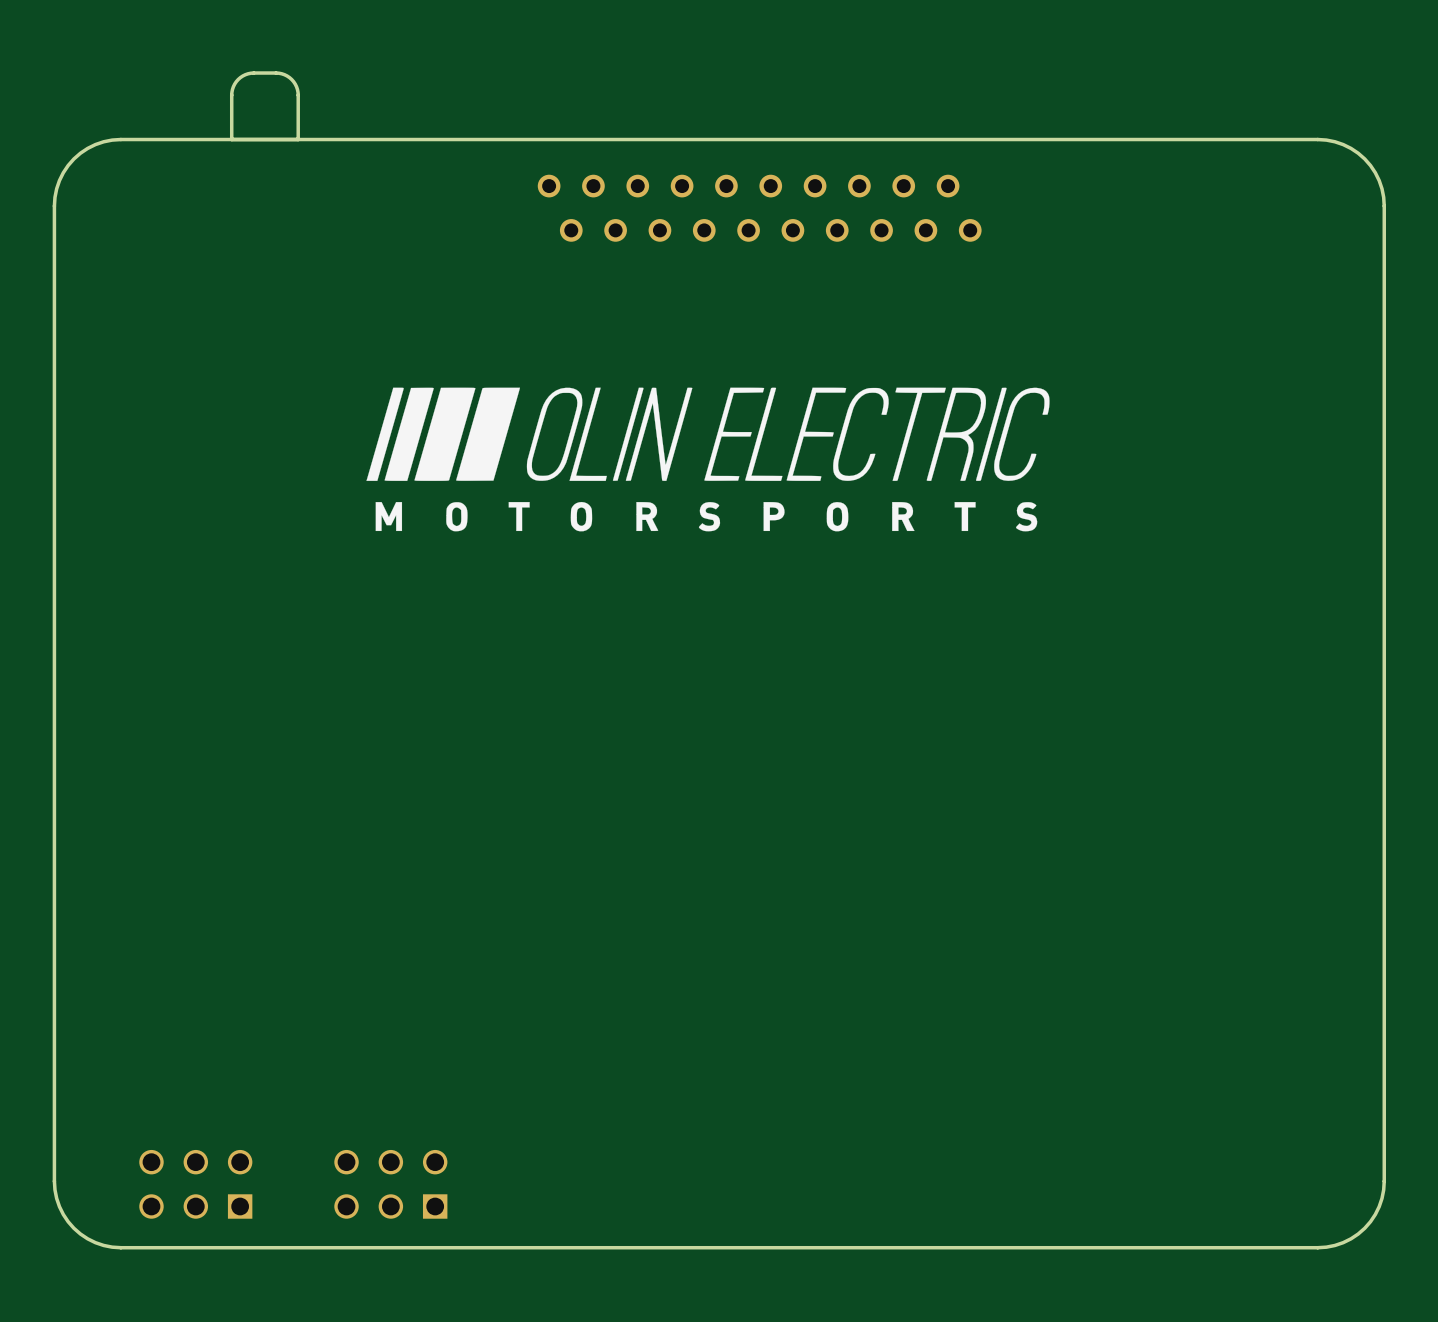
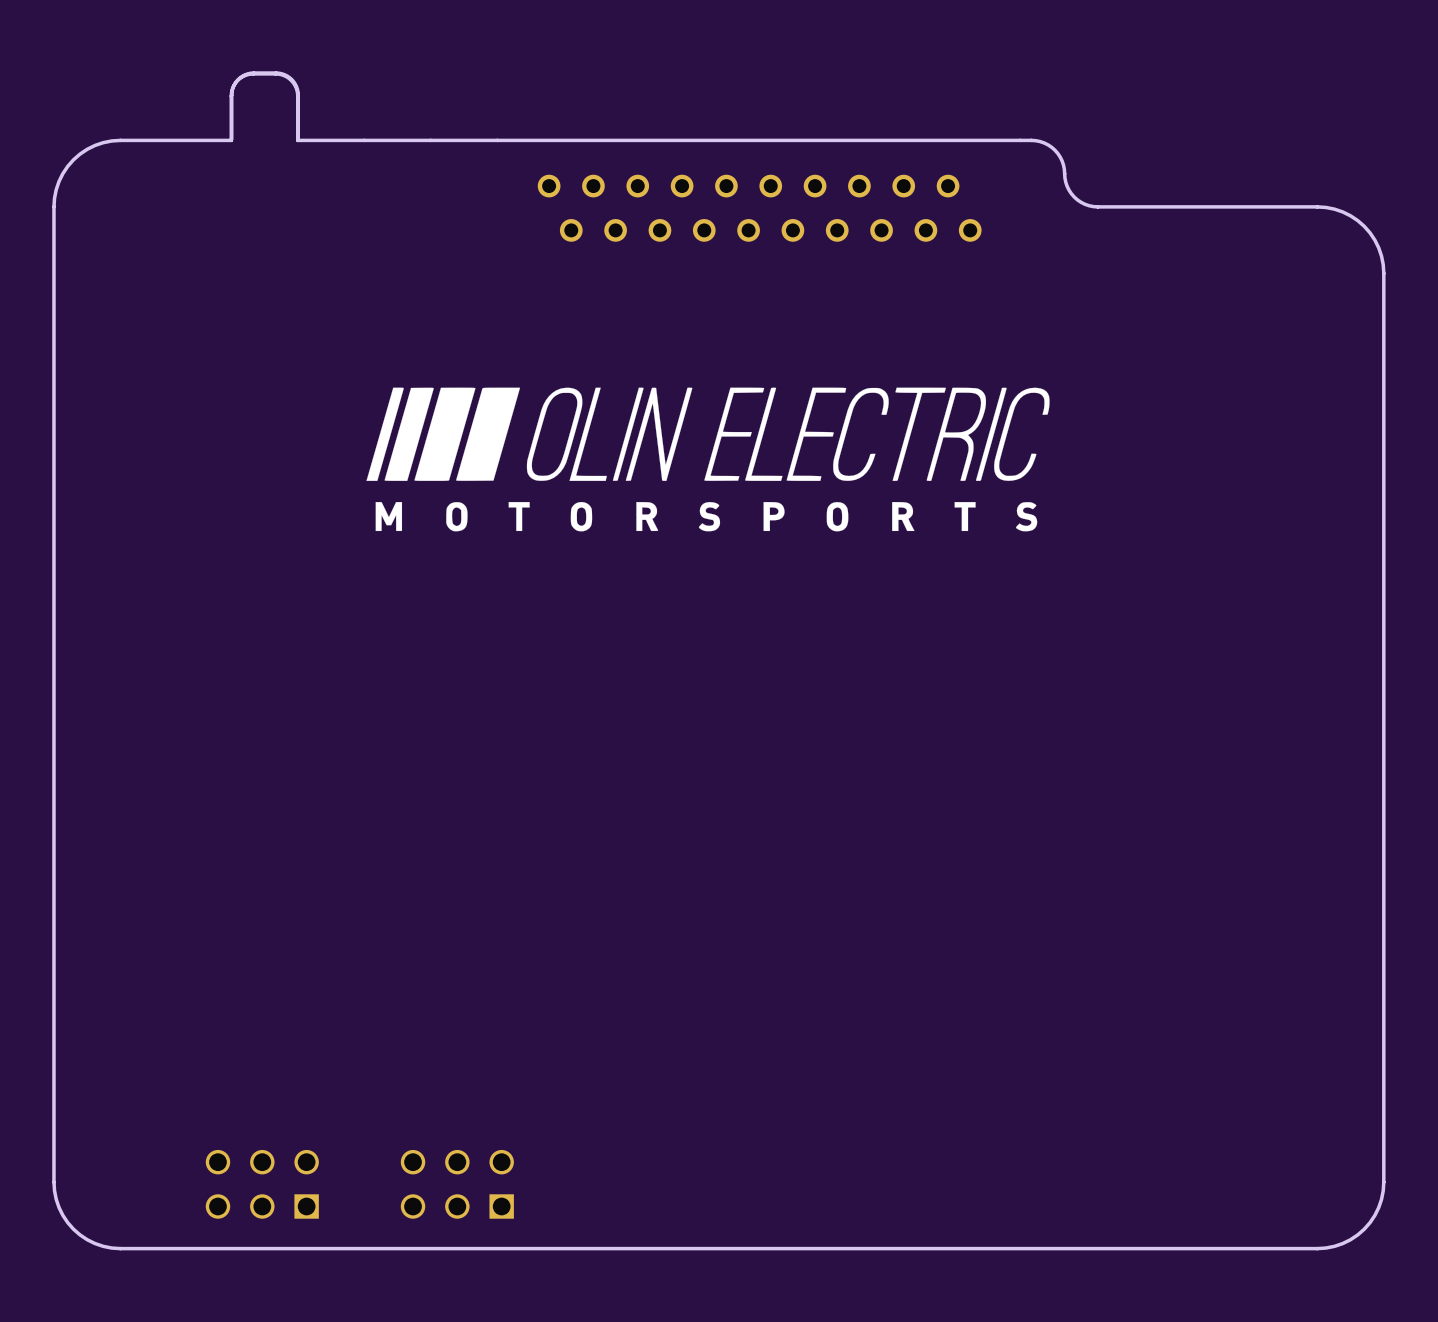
board edge: (1317, 139) (120, 139) (95, 144) (80, 153) (63, 172) (56, 188) (54, 206) (54, 1181) (56, 1198) (68, 1221) (87, 1238) (103, 1245) (120, 1247) (1317, 1247) (1334, 1245) (1358, 1233) (1370, 1221) (1379, 1206) (1384, 1181) (1384, 206) (1379, 180) (1364, 158) (1343, 144) (1317, 139) -> (275, 73) (289, 78) (297, 90) (297, 140) (1035, 140) (1048, 144) (1057, 153) (1063, 165) (1065, 182) (1069, 190) (1077, 200) (1089, 205) (1326, 207) (1342, 211) (1364, 226) (1378, 247) (1383, 273) (1383, 1182) (1378, 1207) (1364, 1229) (1342, 1243) (1317, 1248) (120, 1248) (95, 1243) (73, 1229) (59, 1207) (53, 1182) (54, 198) (62, 173) (73, 159) (87, 149) (103, 142) (120, 140) (231, 140) (231, 96) (234, 84) (239, 78) (247, 74) (275, 73)
part: (195, 1184) -> none
part: none -> (262, 1184)
part: (390, 1184) -> none
part: none -> (457, 1184)

